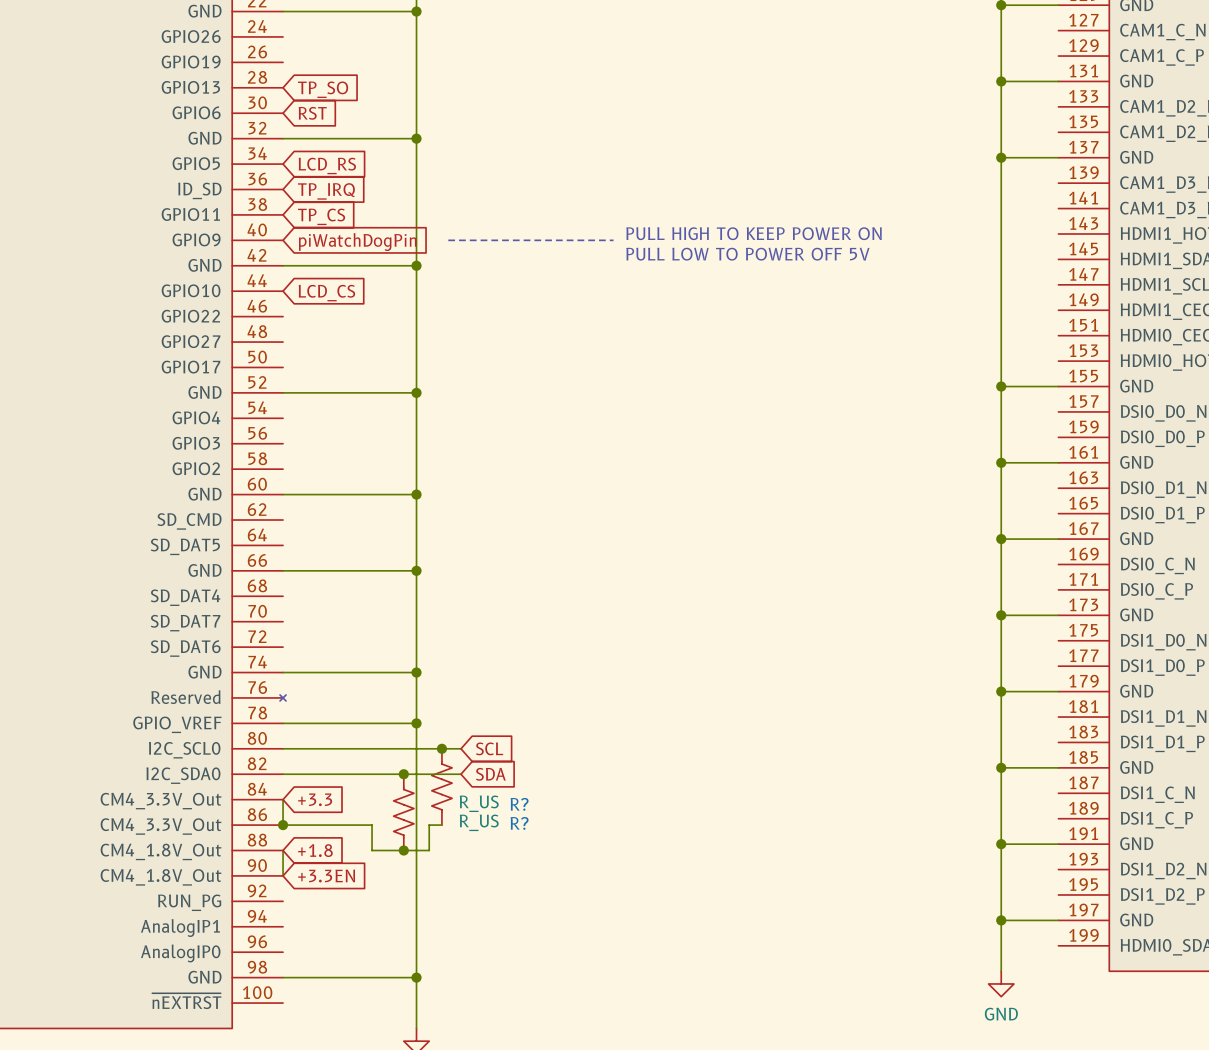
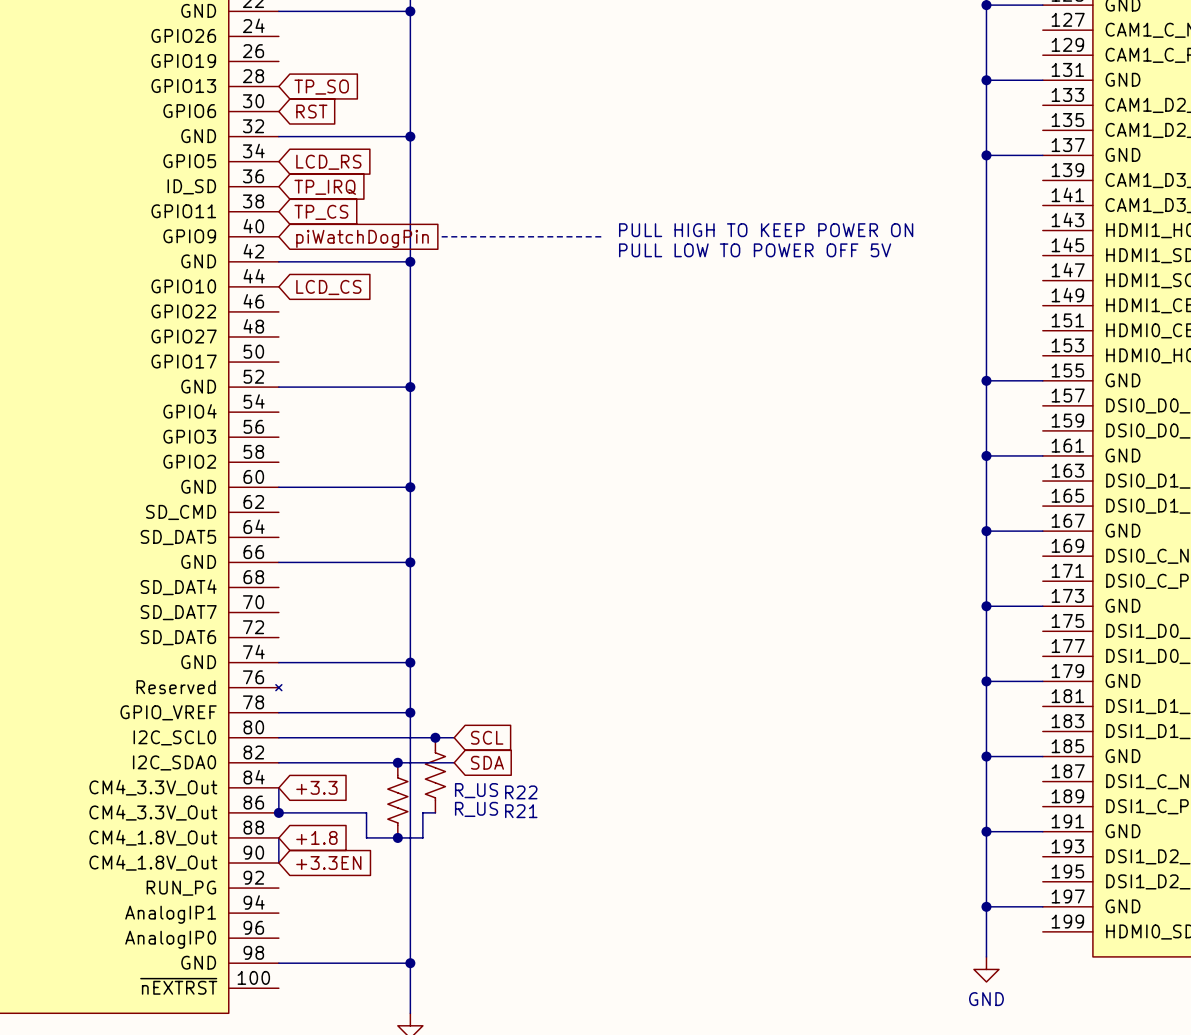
R? name: R? (519, 804) -> R22 (521, 792)
R? name: R? (519, 823) -> R21 (521, 811)

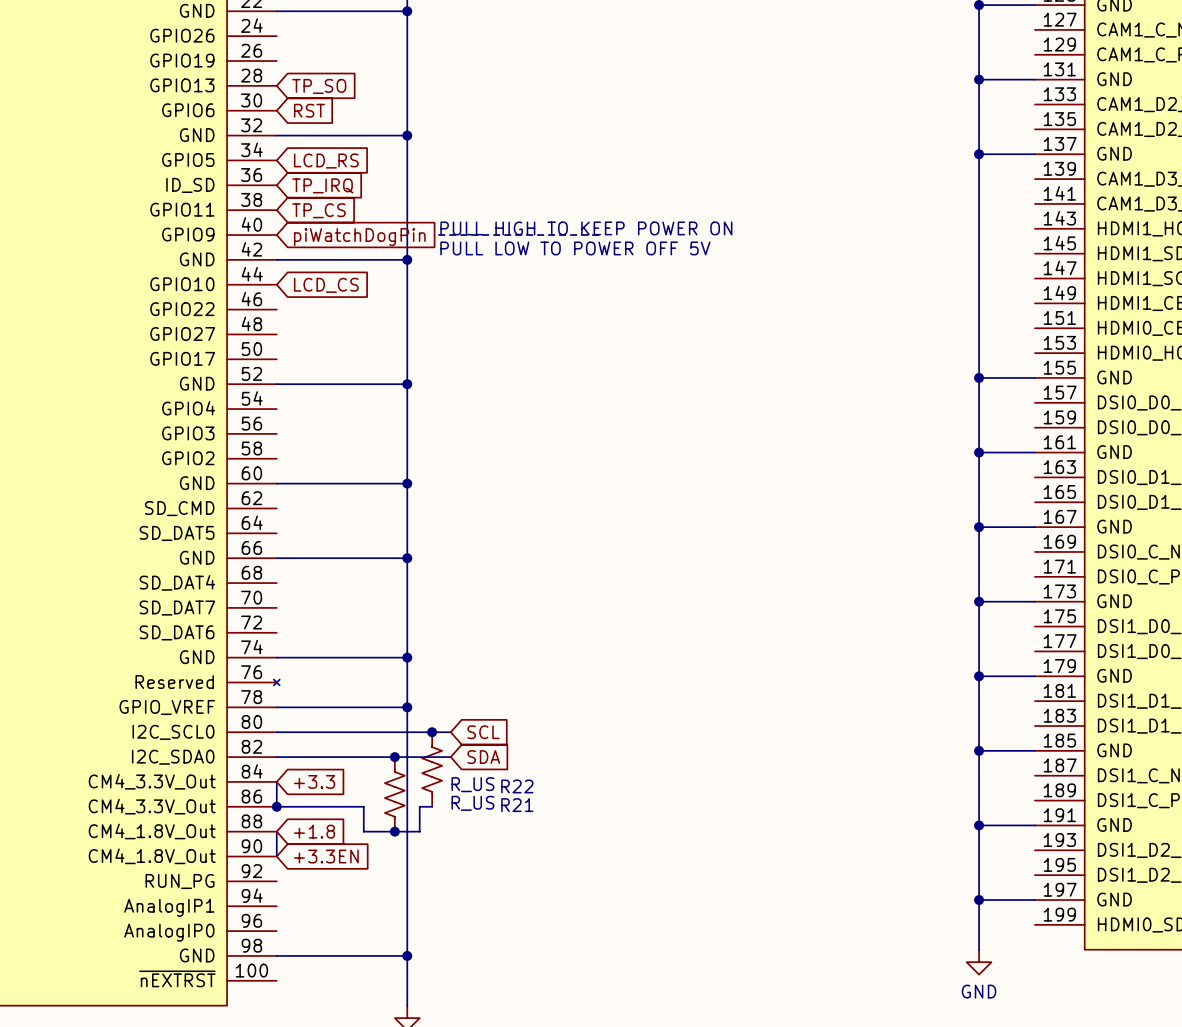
text position: PULL HIGH TO KEEP POWER ON (766, 230) -> PULL HIGH TO KEEP POWER ON (586, 228)
text position: PULL LOW TO POWER OFF 5V (755, 250) -> PULL LOW TO POWER OFF 5V (575, 248)

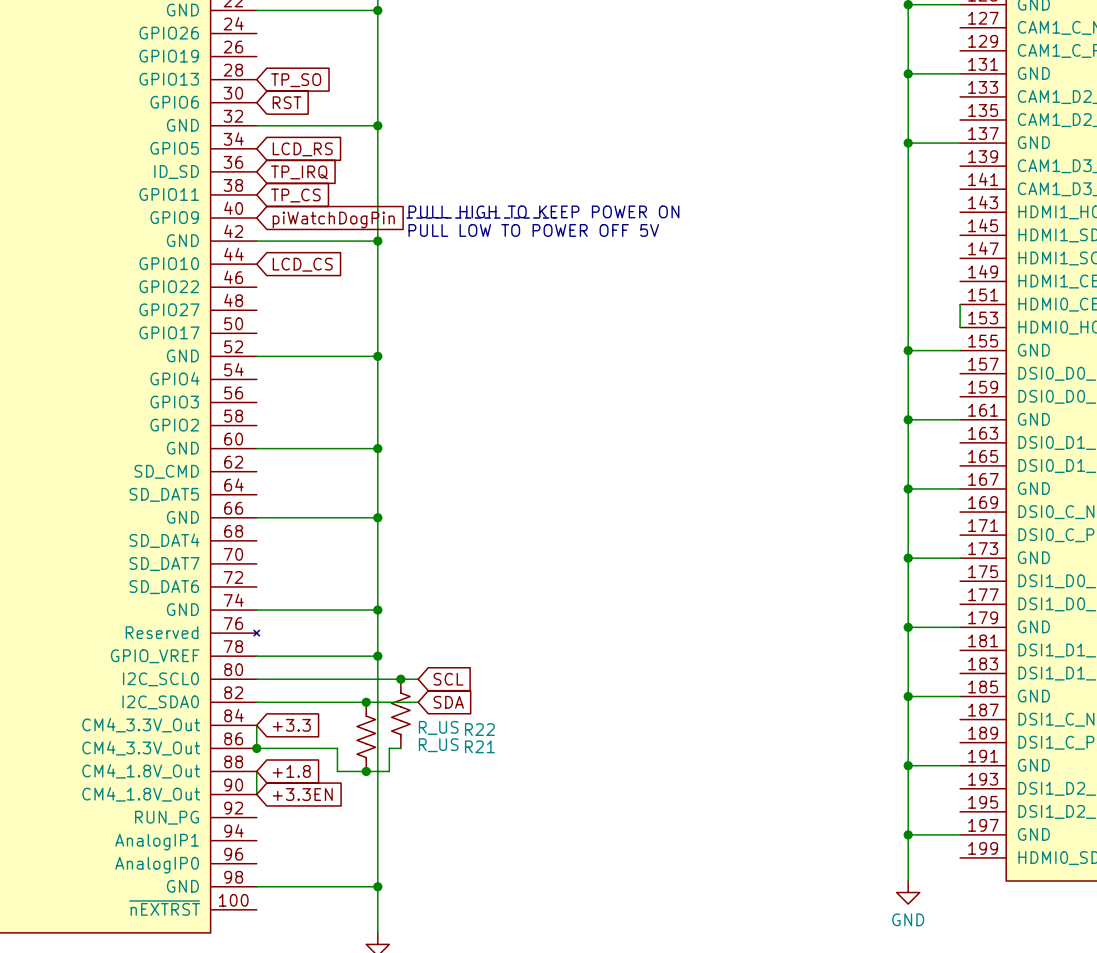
wire: none -> (960, 304) (960, 327)

